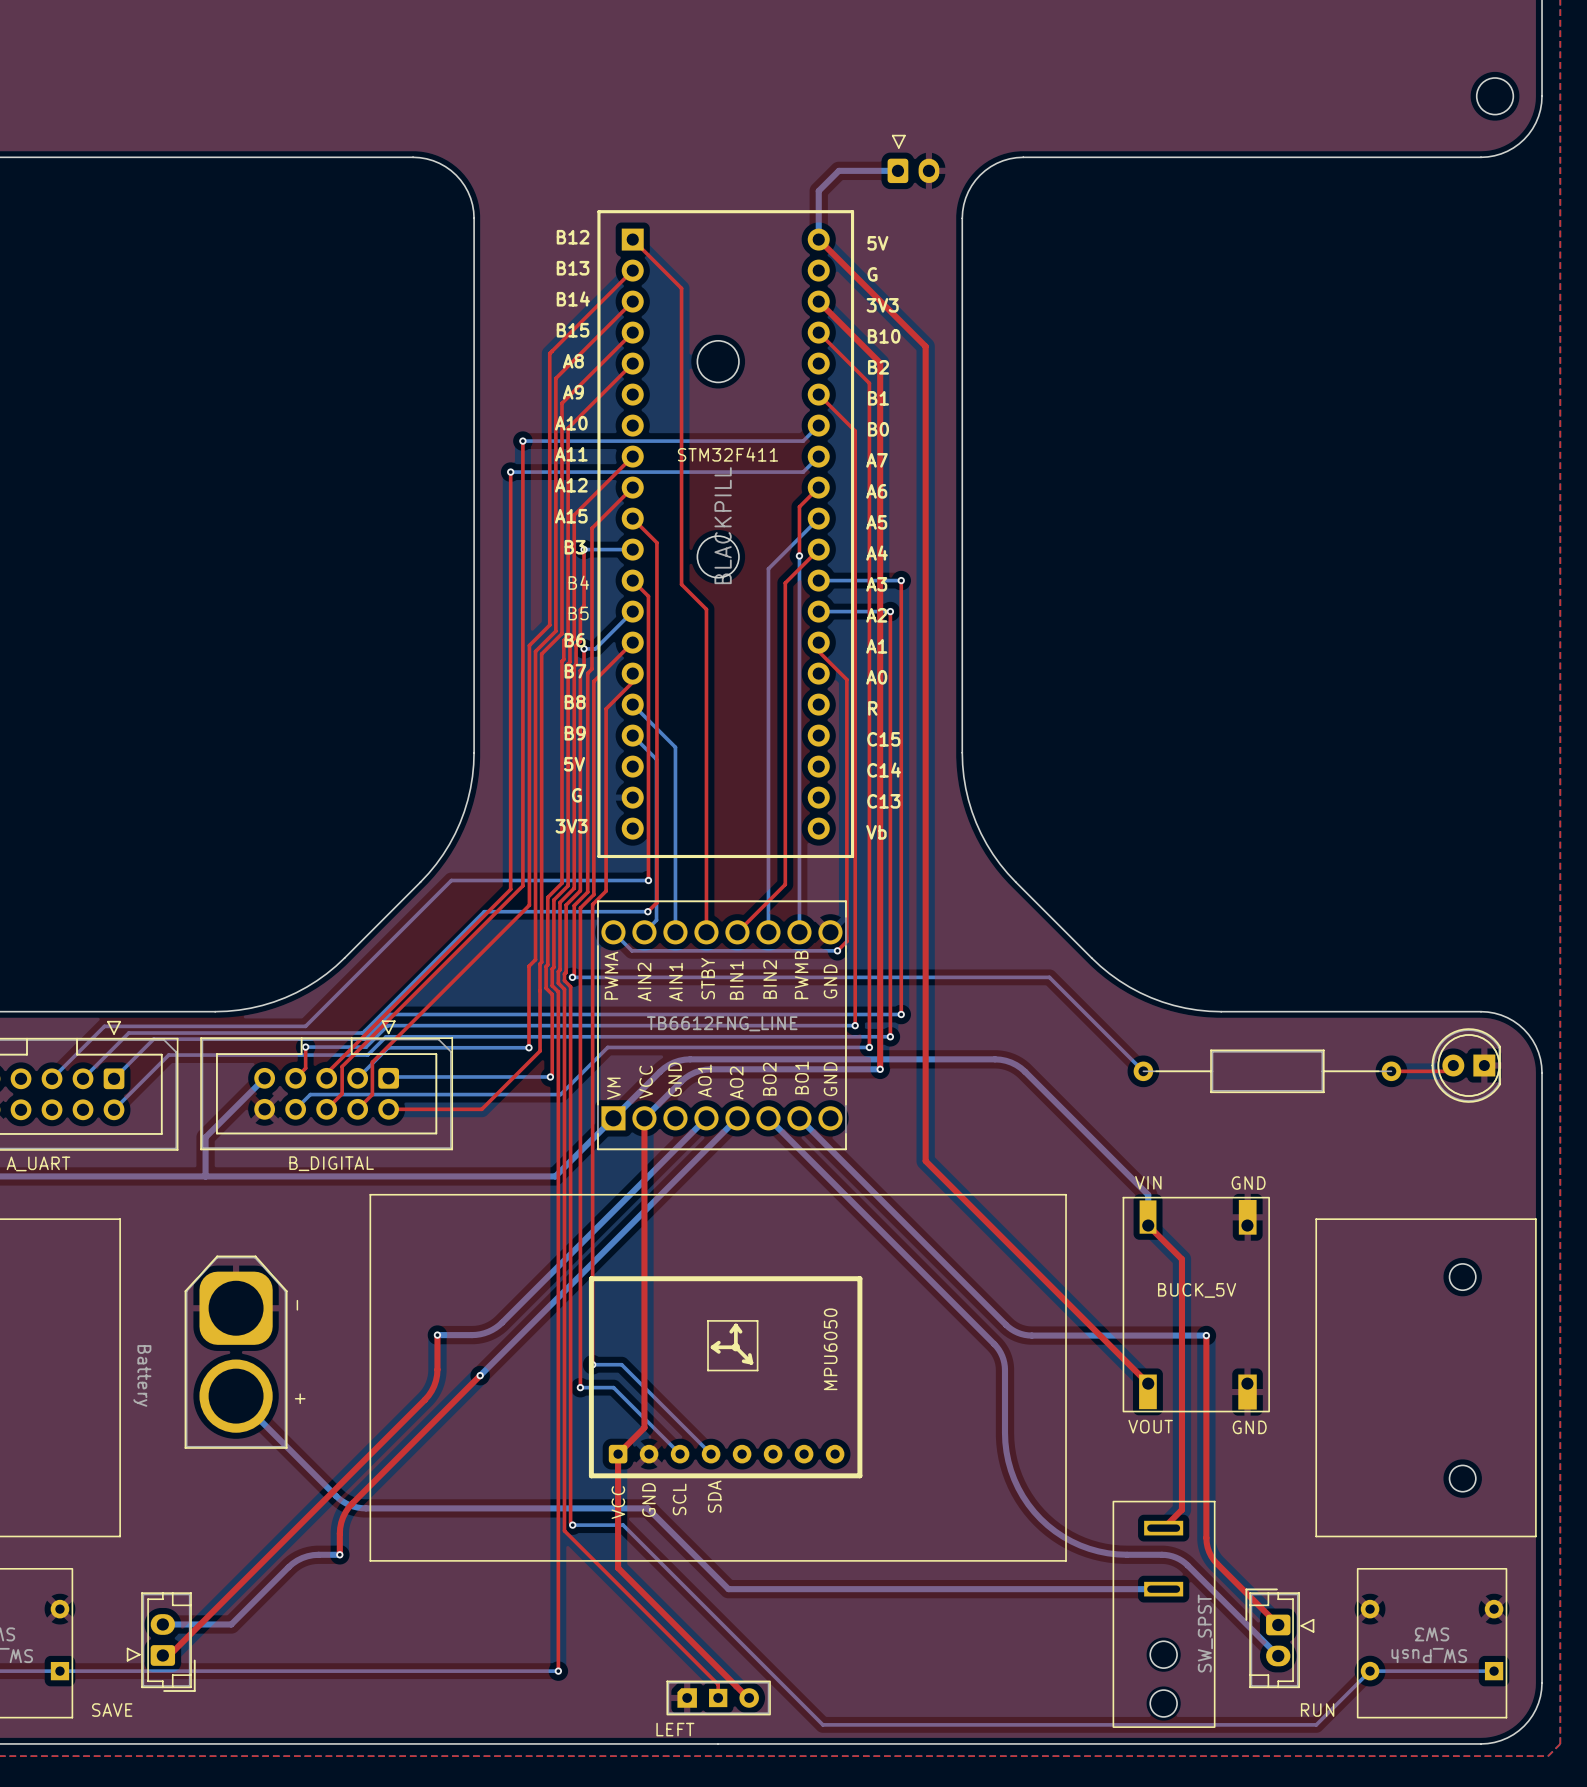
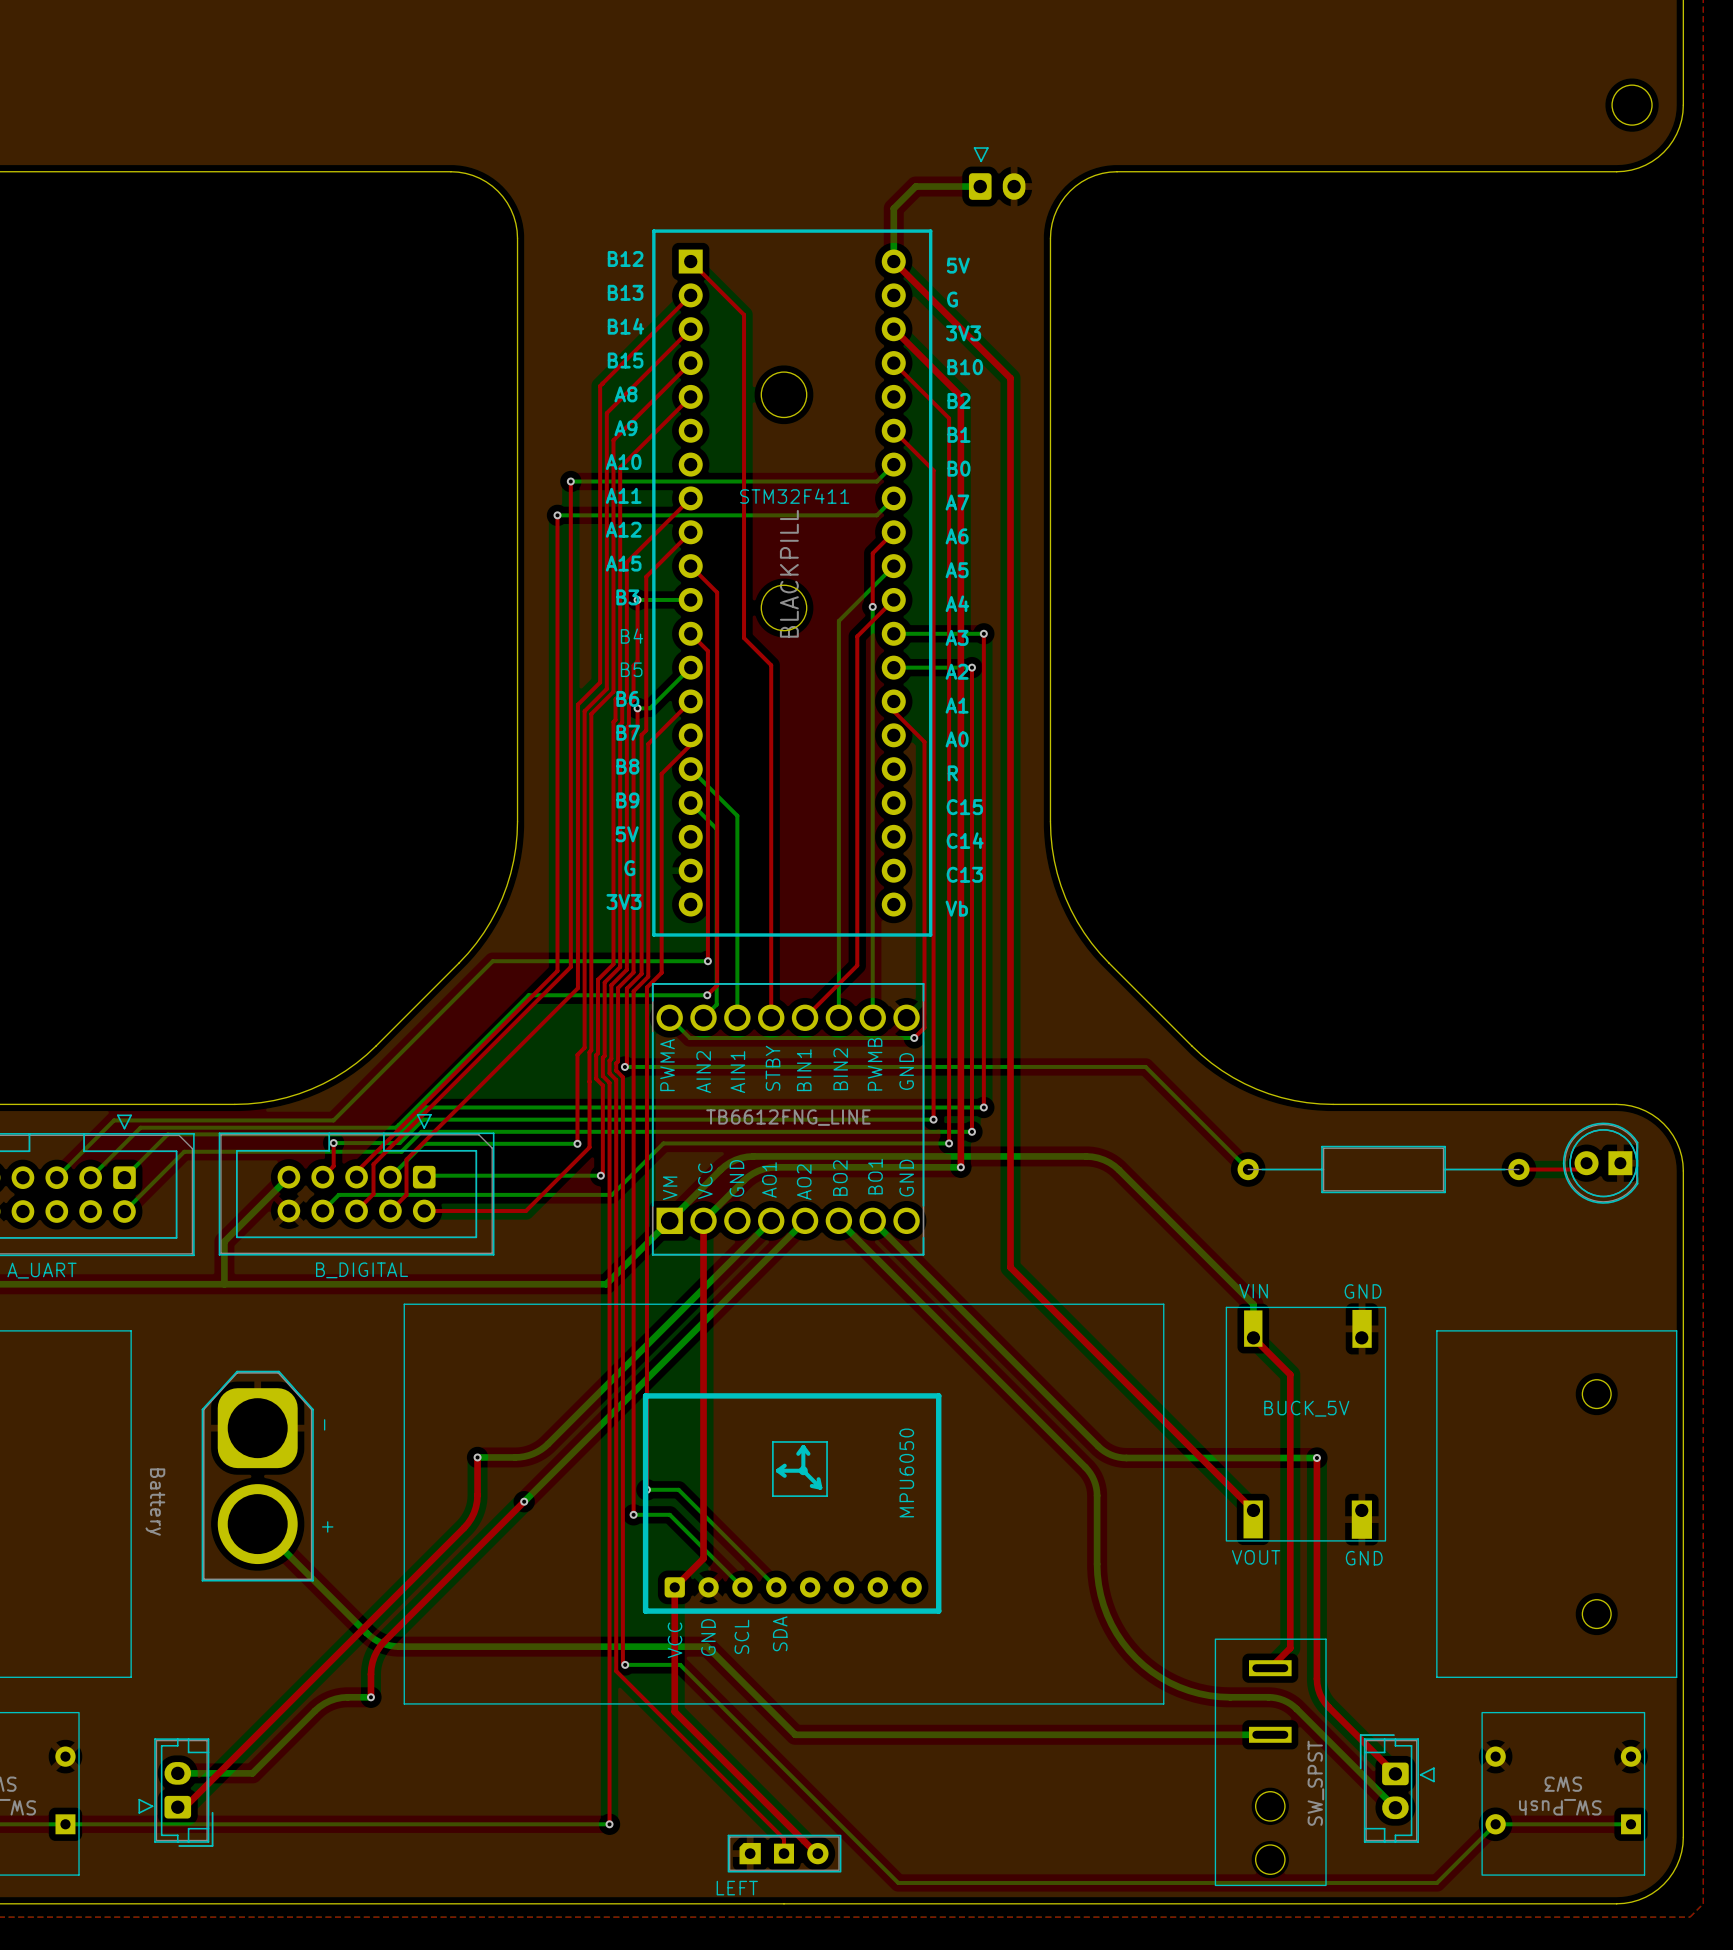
text: SAVE (112, 1710) -> none
text: RUN (1317, 1710) -> none

